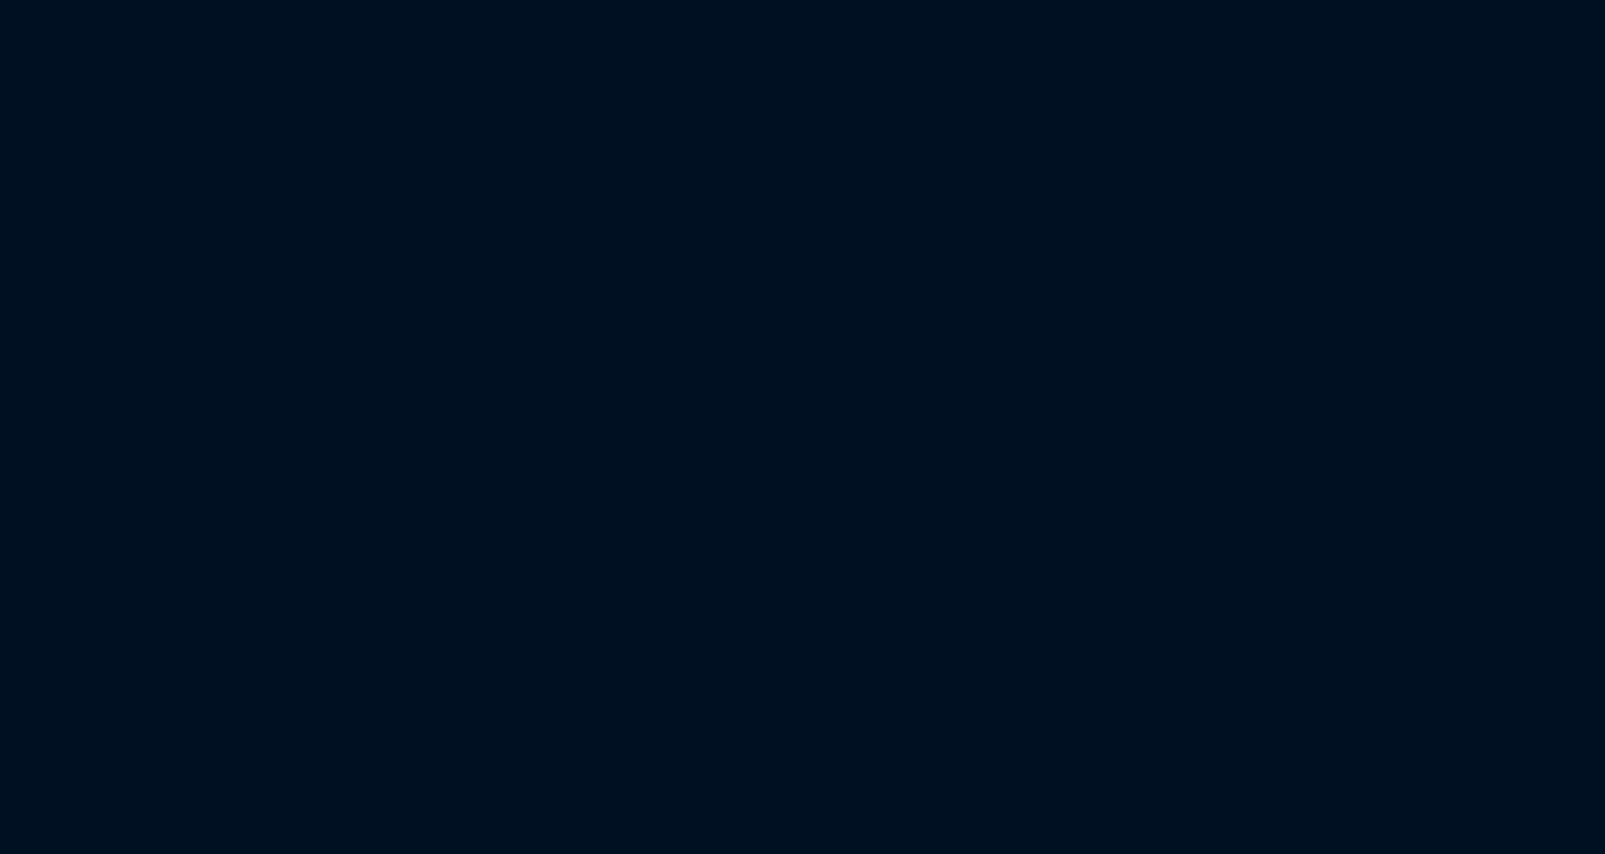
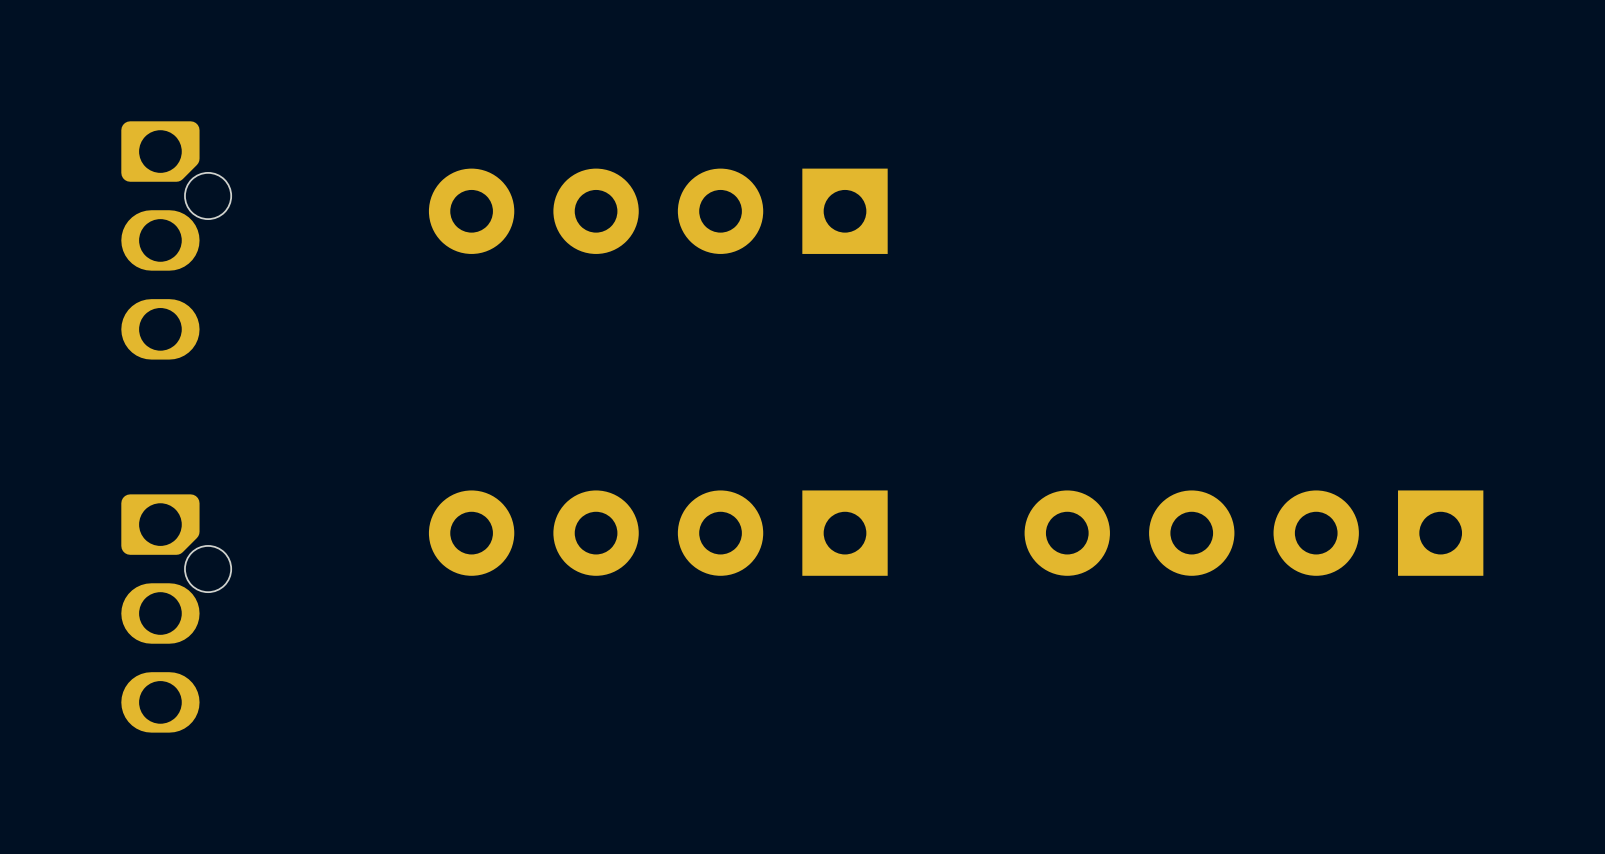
part: none -> (658, 211)
part: none -> (176, 240)
part: none -> (658, 533)
part: none -> (1253, 533)
part: none -> (176, 613)

